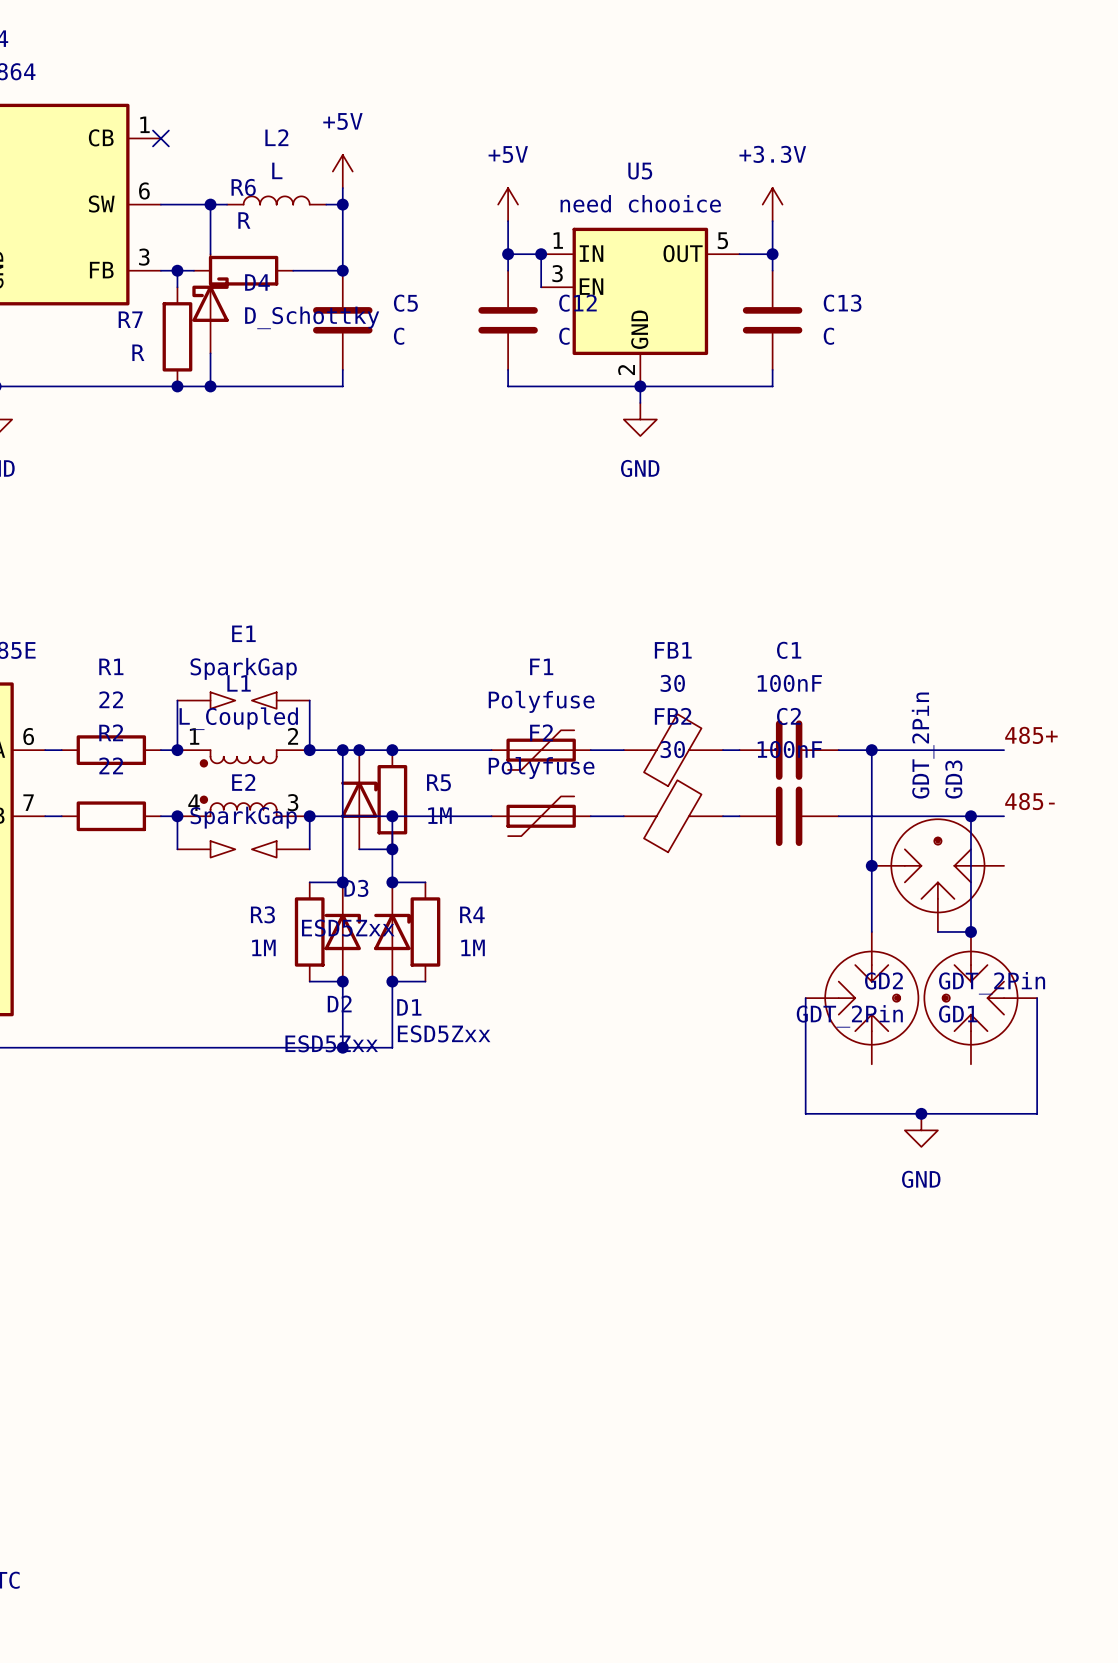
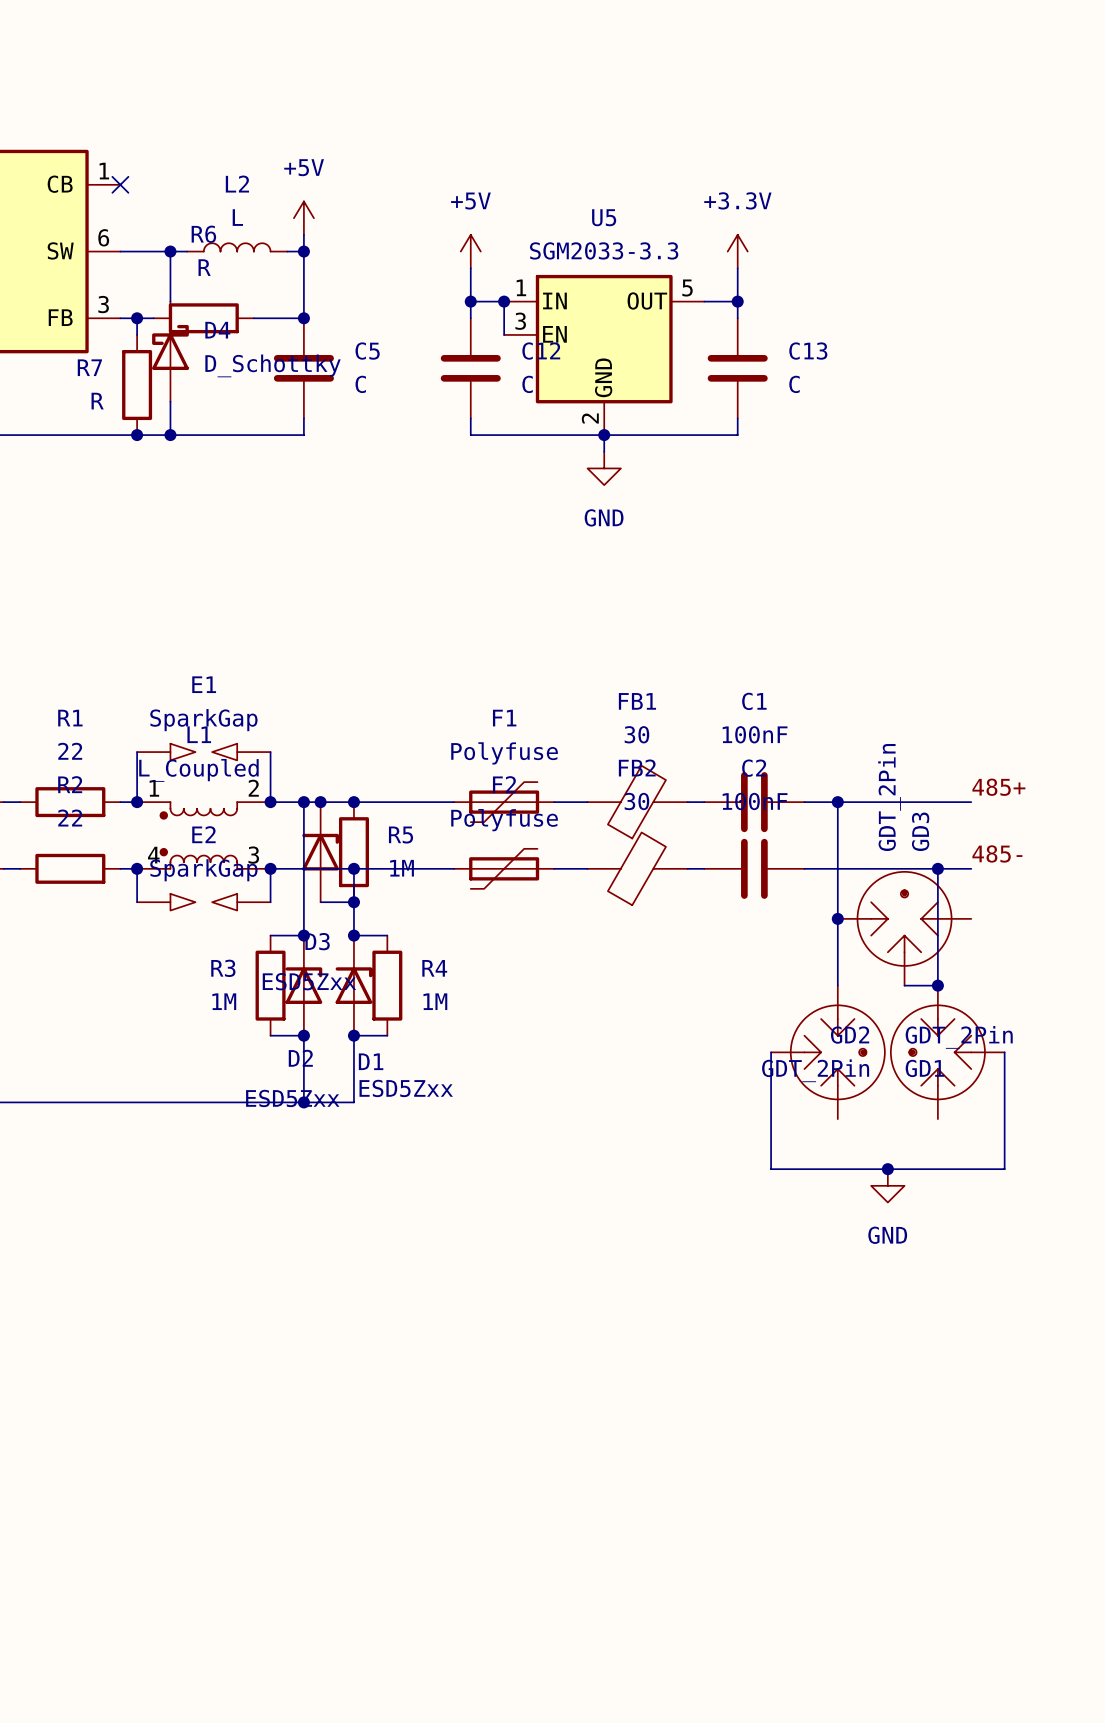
U5 value: need chooice (640, 203) -> SGM2033-3.3 (604, 250)

